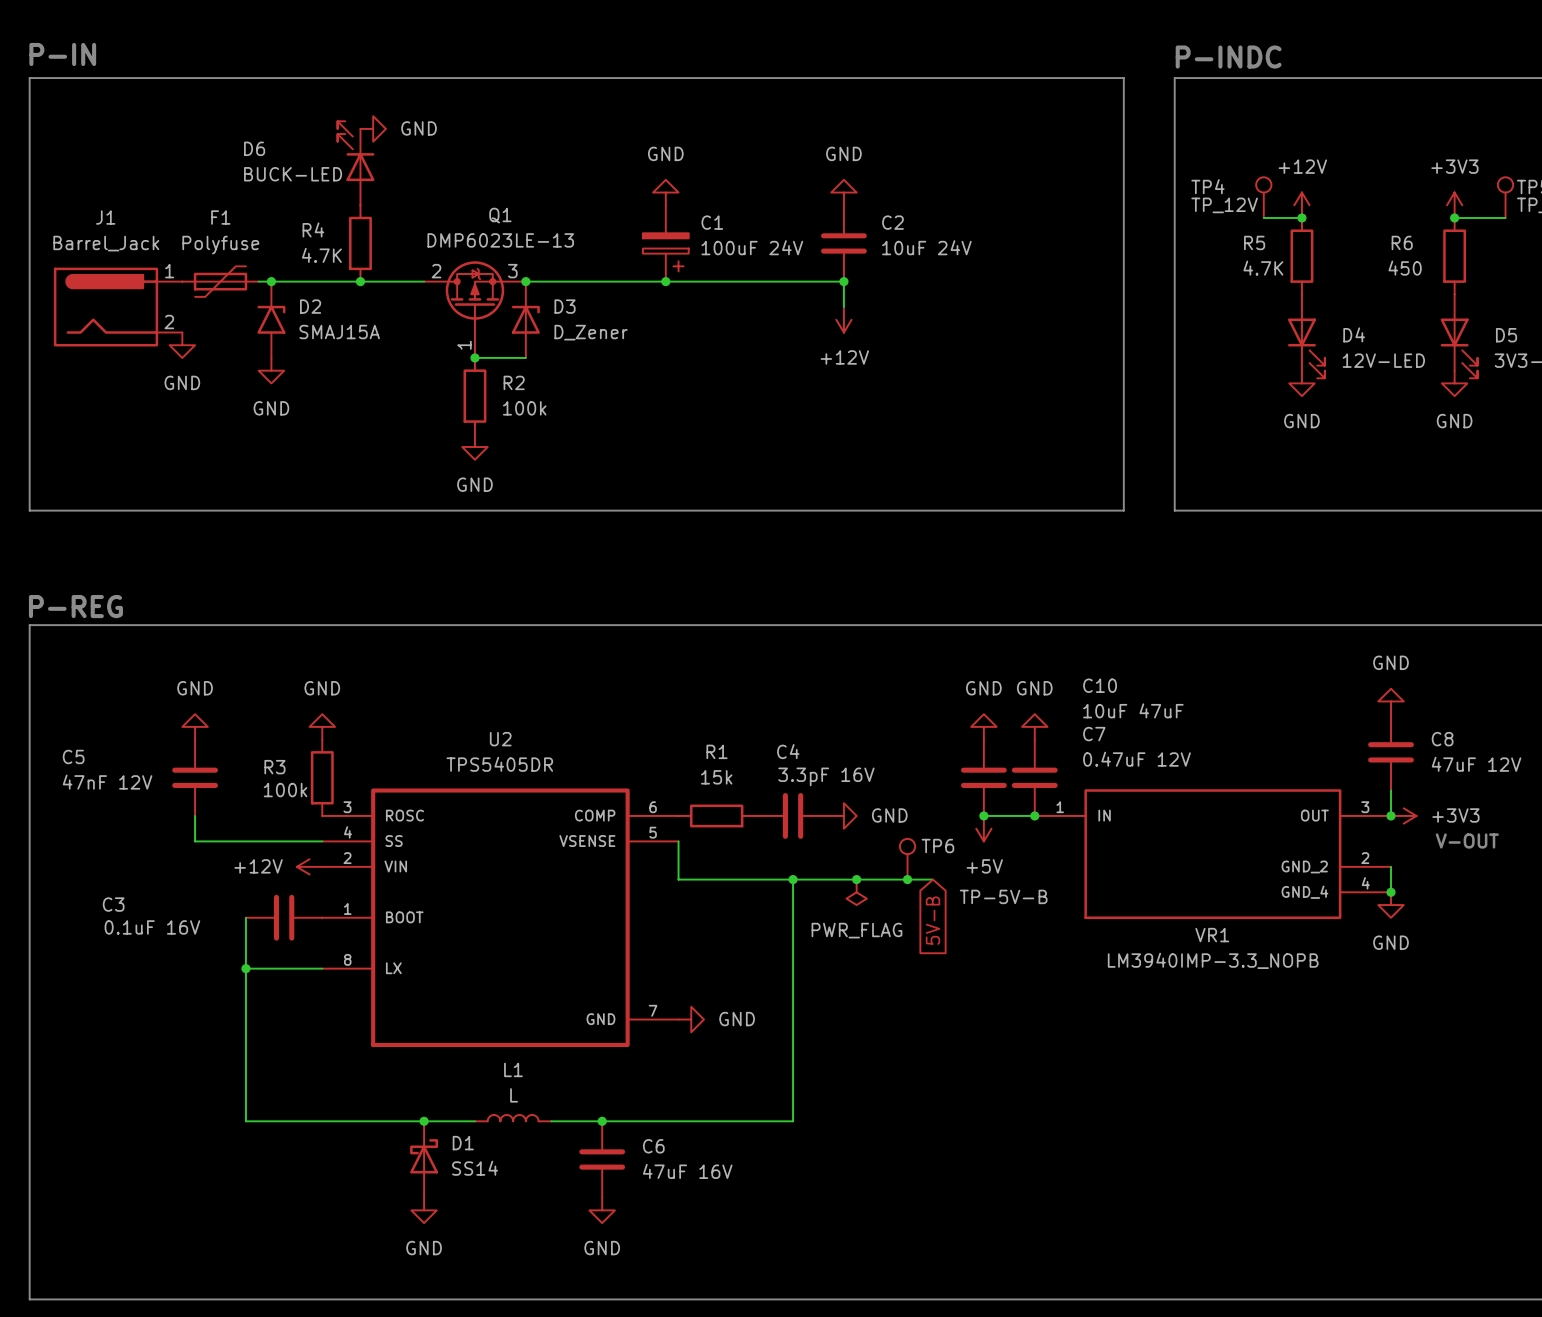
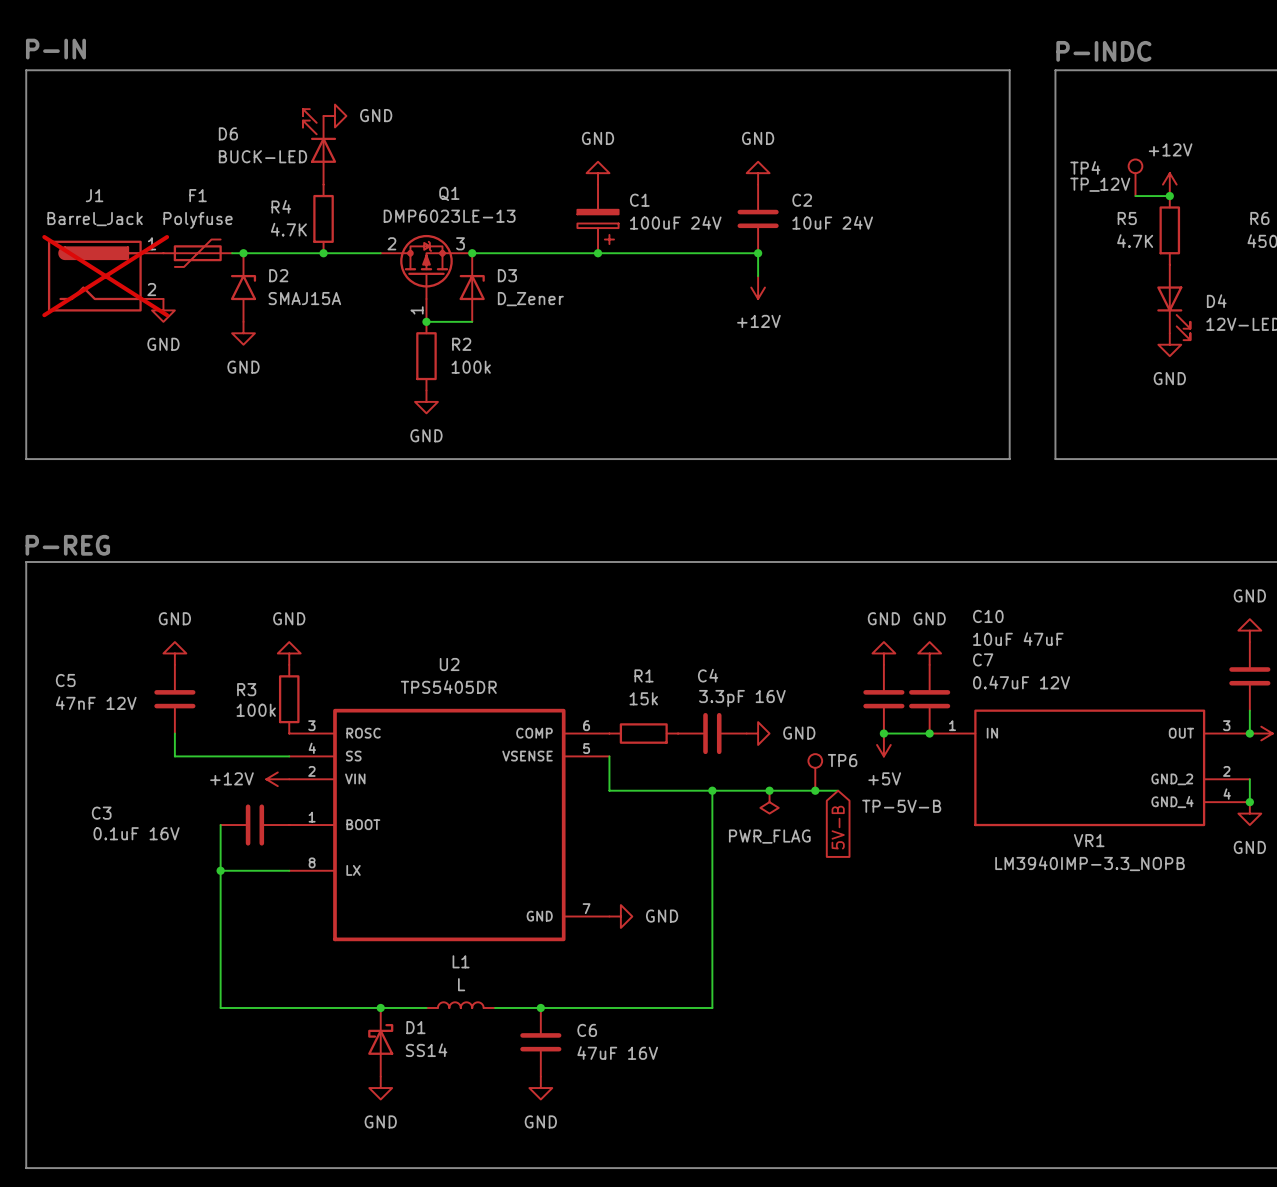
J1 do-not-place cross: none -> (105, 276)

